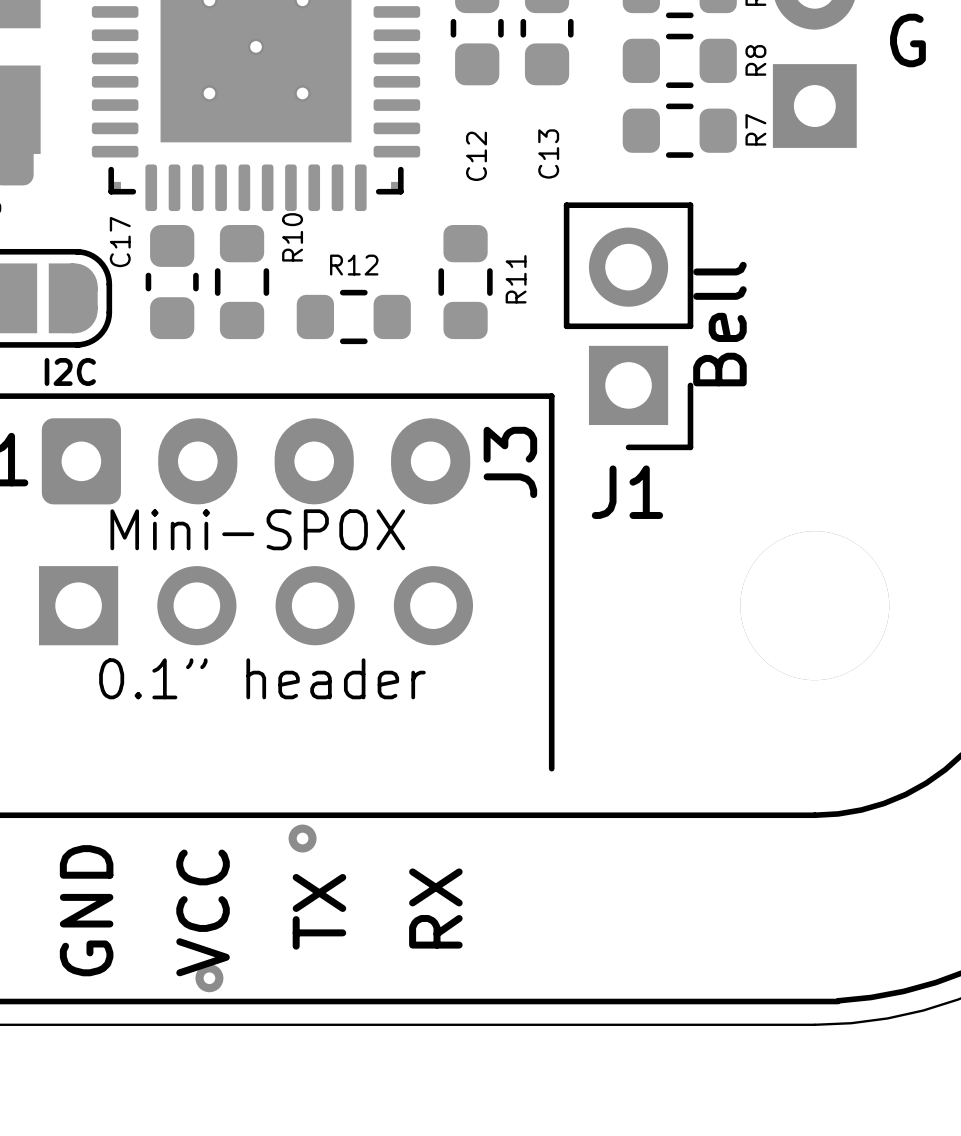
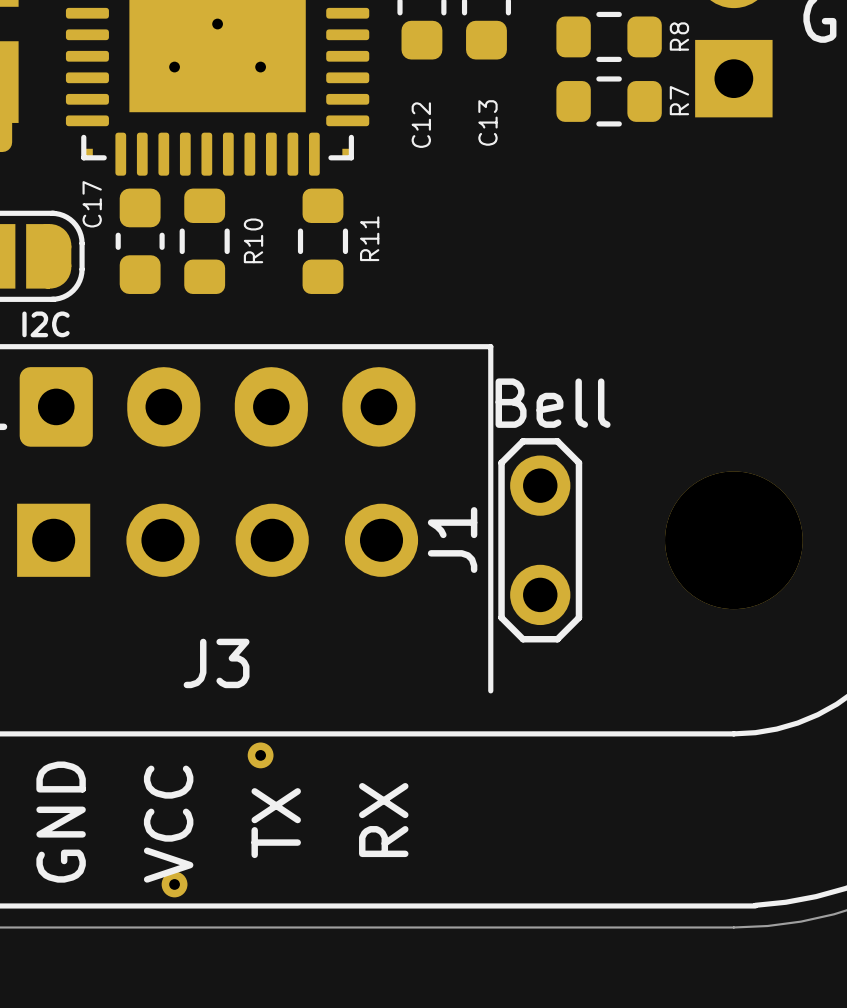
J1 footprint: [563, 202, 694, 451] -> [498, 438, 583, 643]
R10 name position: R10 (292, 237) -> R10 (253, 240)
R11 position: (465, 282) -> (322, 241)
R12: (353, 316) -> none
text rotation: 0° (719, 324) -> 90° clockwise (553, 403)
J3 name rotation: 0° (510, 462) -> 90° clockwise (216, 663)
J3 name position: J3 (510, 462) -> J3 (216, 663)
J1 name position: J1 (627, 492) -> J1 (452, 540)
text: Mini-SPOX (257, 529) -> none
text: 0.1” header (262, 678) -> none

